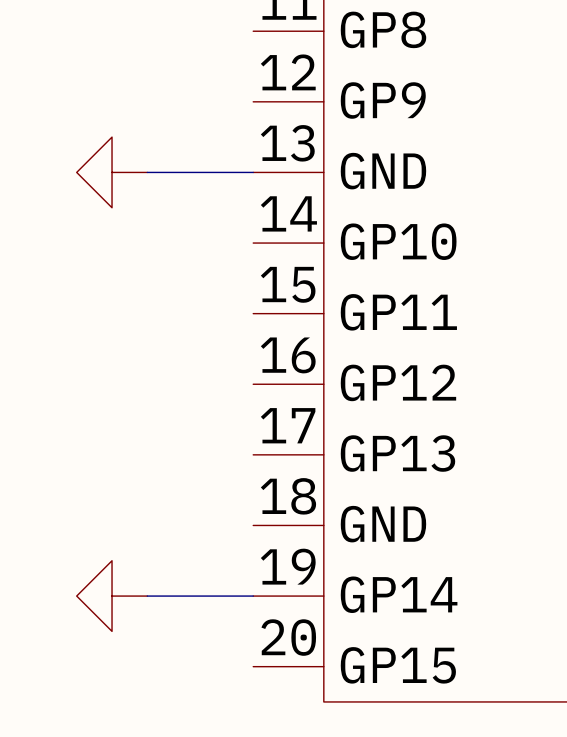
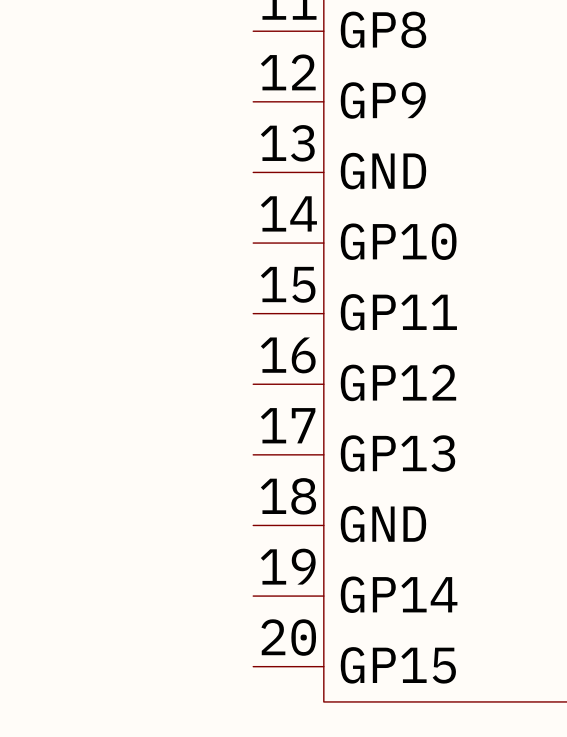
power symbol: (112, 172) -> none
wire: (147, 172) (253, 172) -> none
power symbol: (112, 596) -> none
wire: (147, 596) (253, 596) -> none

